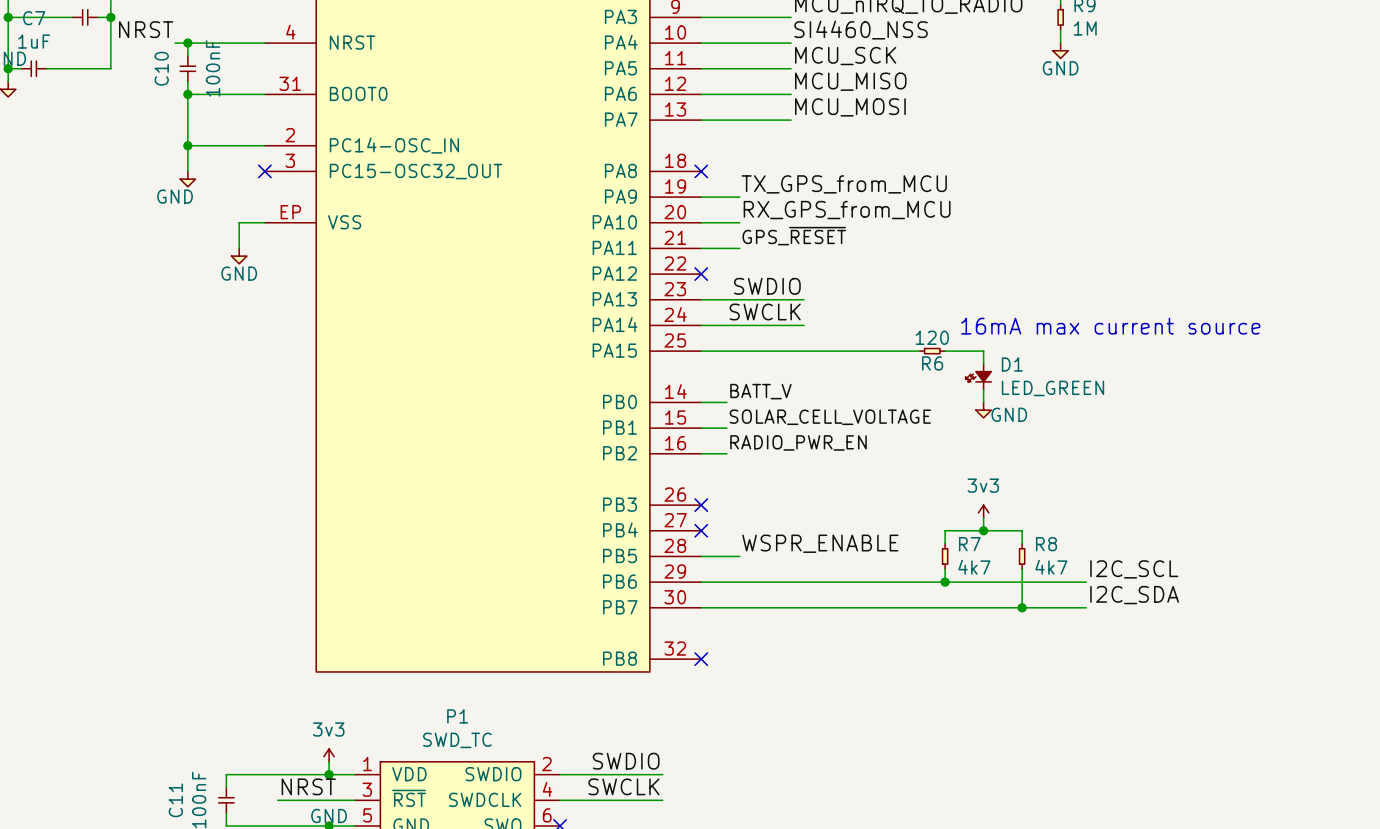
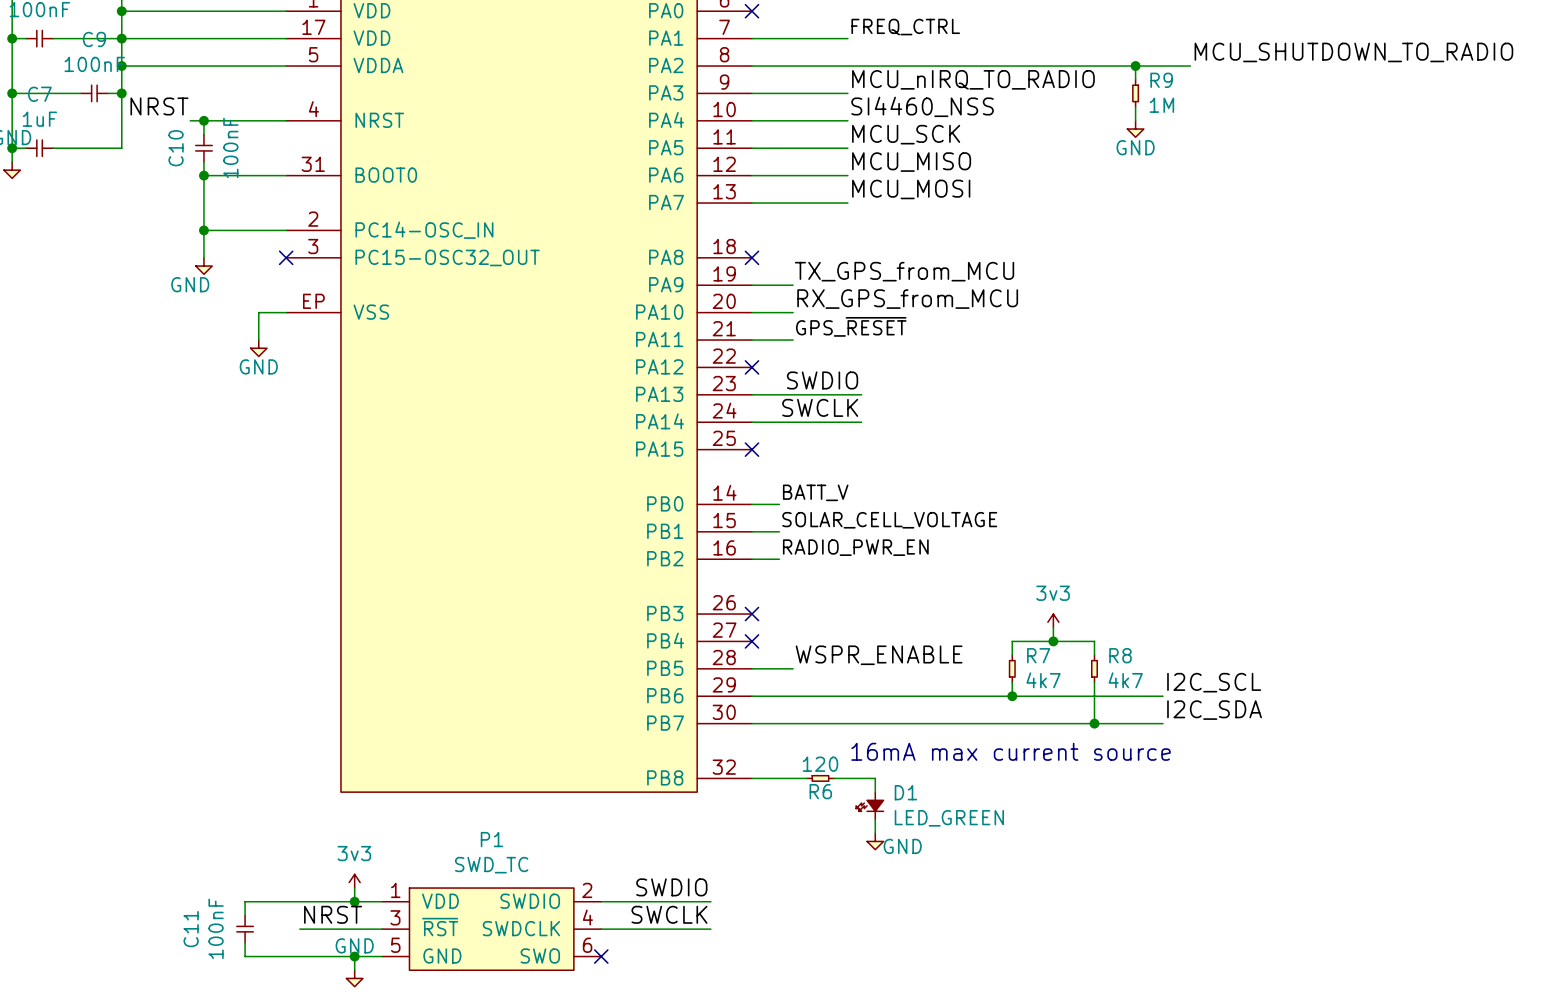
text: 16mA max current source (1110, 326) -> none
wire: (701, 351) (919, 351) -> none
no-connect mark: none -> (751, 449)
R6 position: (932, 351) -> (820, 778)
wire: (945, 351) (983, 351) (983, 363) -> none
D1 position: (978, 376) -> (869, 805)
wire: (983, 389) (983, 402) -> none
power symbol: GND (983, 410) -> none
text: none -> 16mA max current source (1011, 751)
wire: none -> (751, 778) (806, 778)
no-connect mark: (701, 659) -> none
wire: none -> (834, 778) (875, 778) (875, 792)
wire: none -> (875, 819) (875, 833)
power symbol: none -> GND (875, 841)

